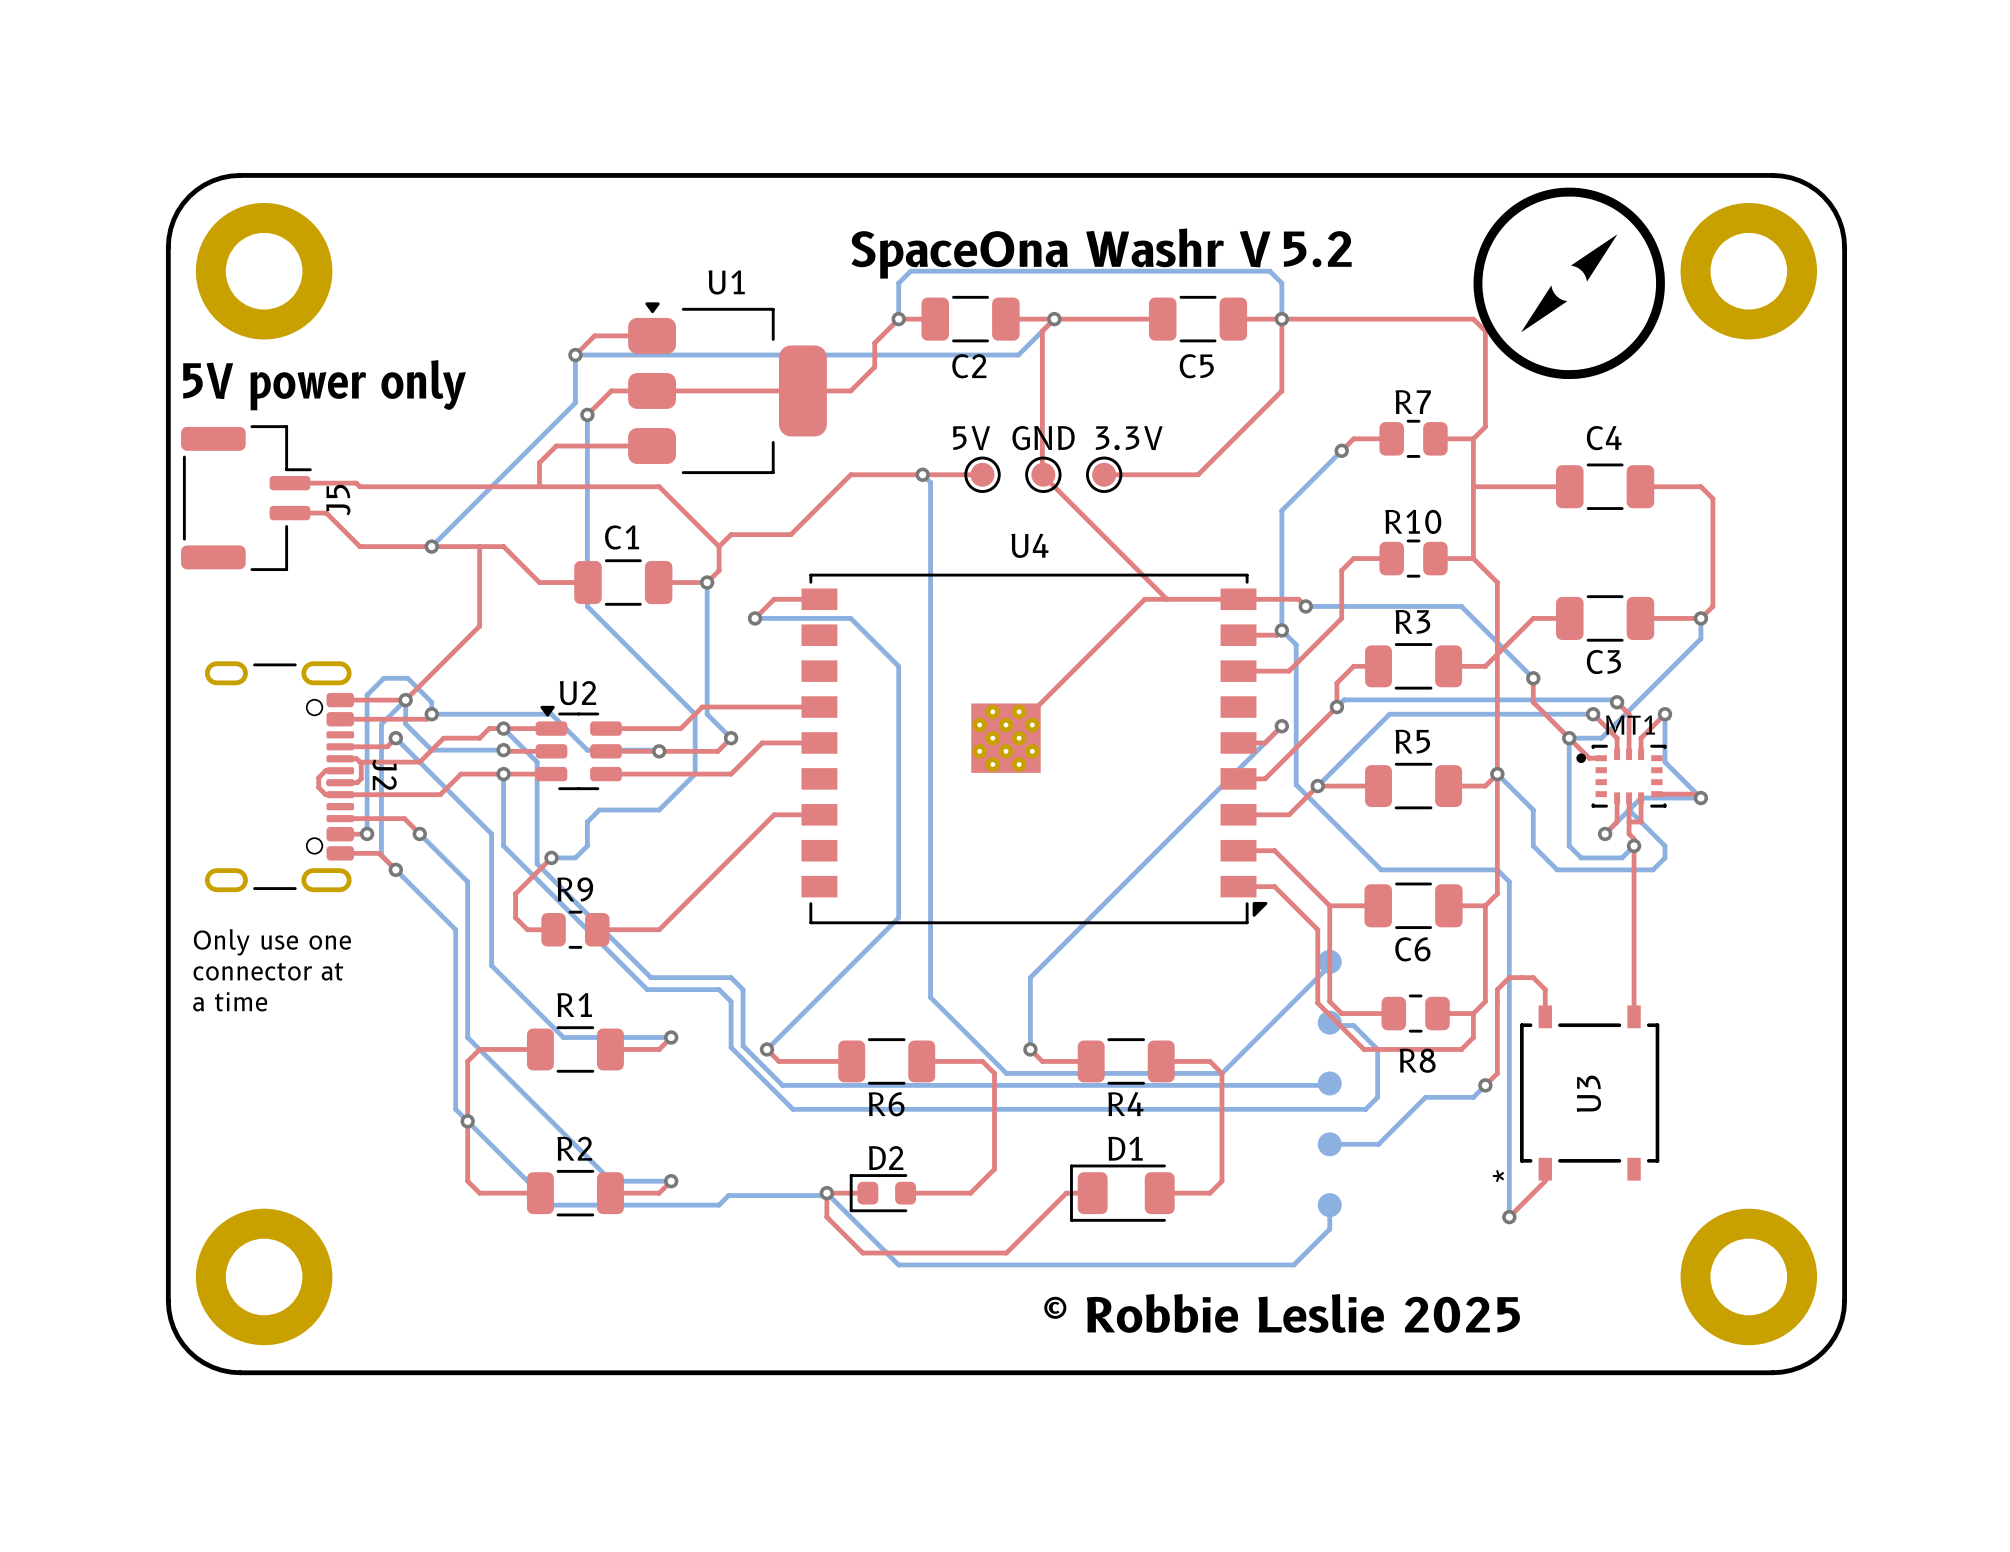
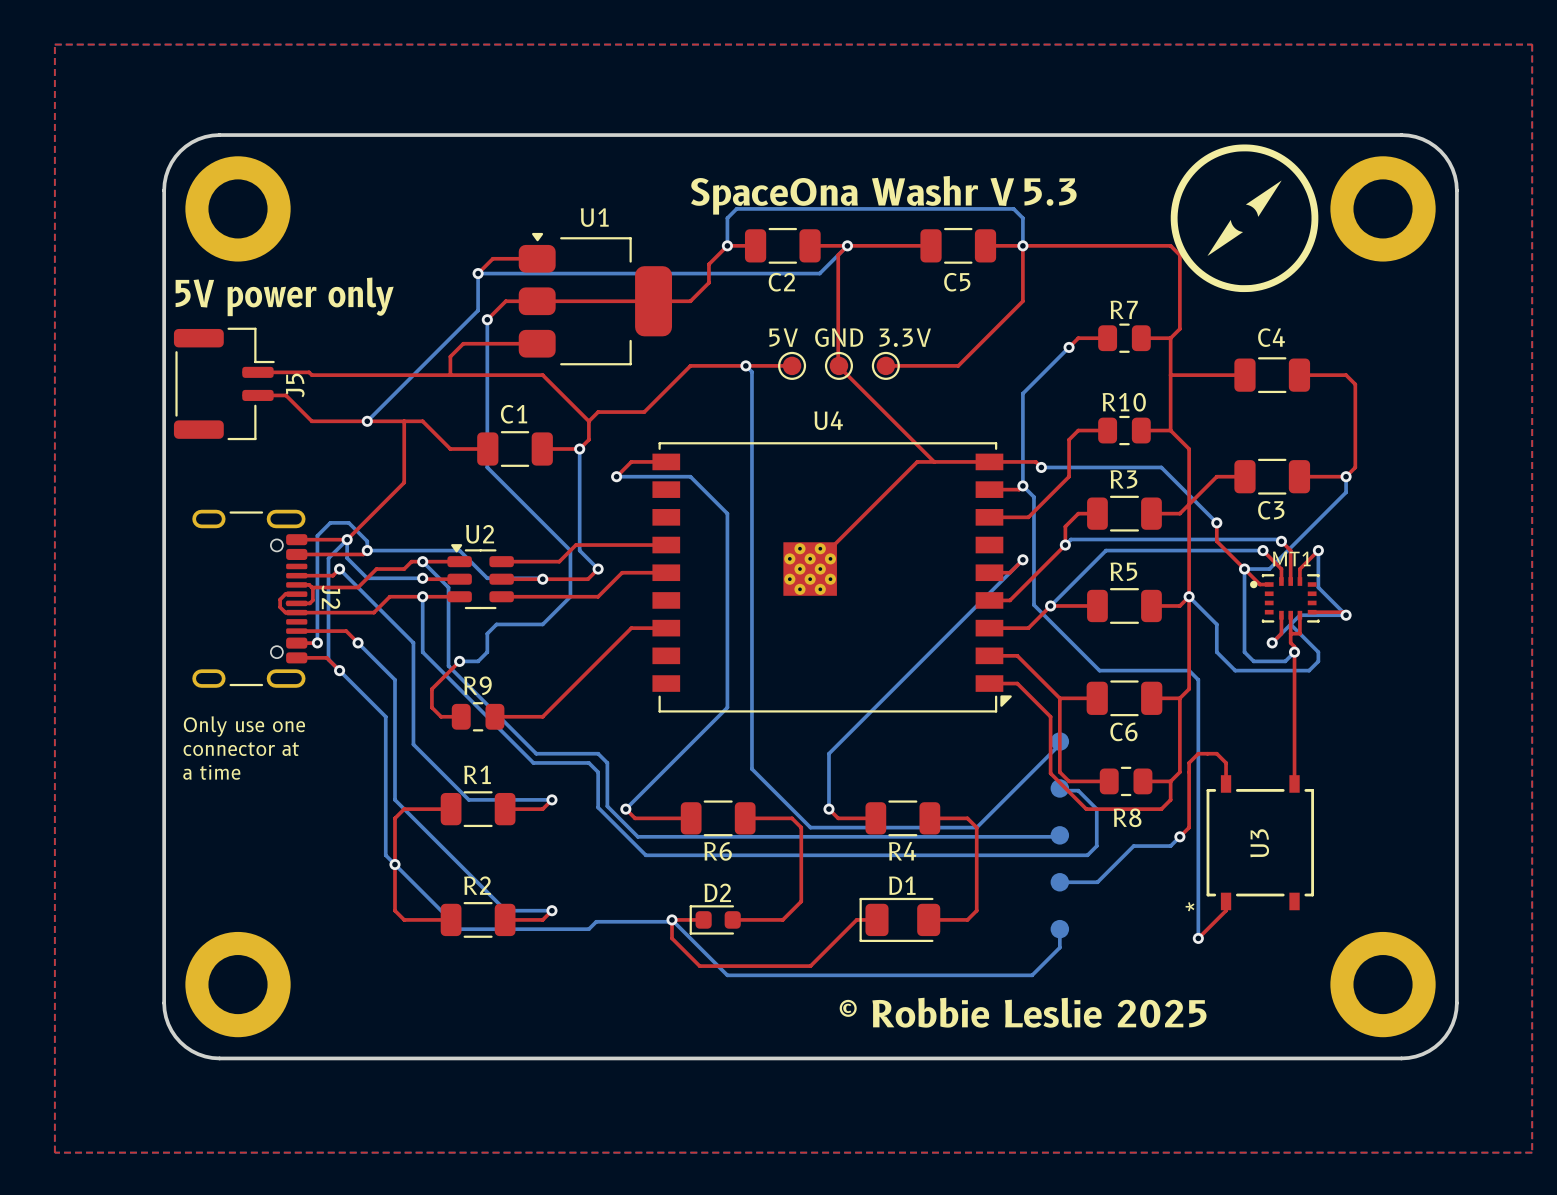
top zone outline: none -> (54, 44) (1532, 44) (1532, 1152) (54, 1152) (54, 44)
text: SpaceOna Washr V 5.2 (1101, 253) -> SpaceOna Washr V 5.3 (883, 195)

